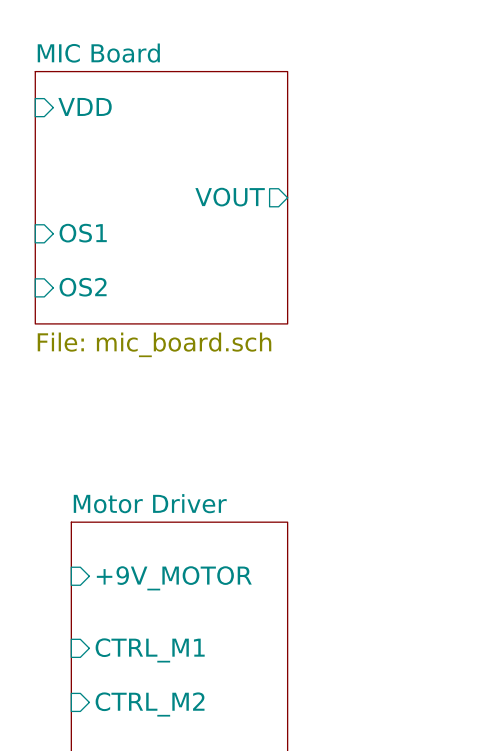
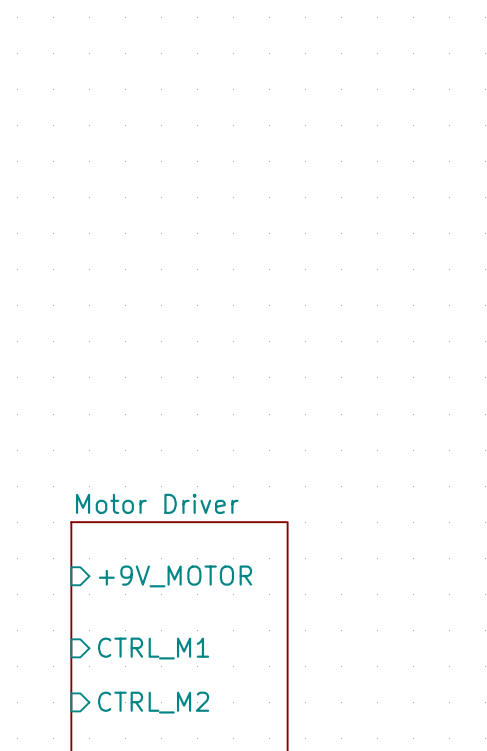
sheet pin: VDD (85, 106) -> none
sheet MIC Board: File: mic_board.sch (161, 197) -> none
sheet pin: VOUT (230, 197) -> none
sheet pin: OS1 (83, 233) -> none
sheet pin: OS2 (83, 287) -> none

